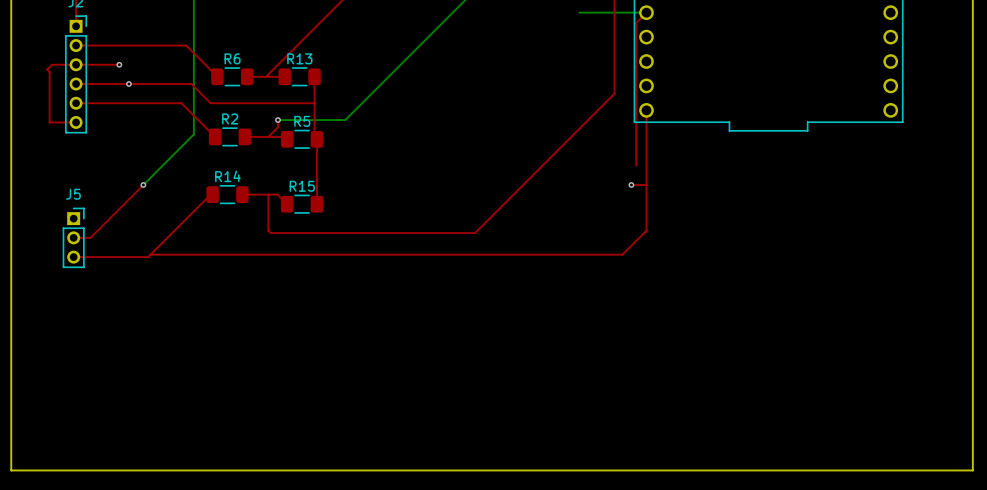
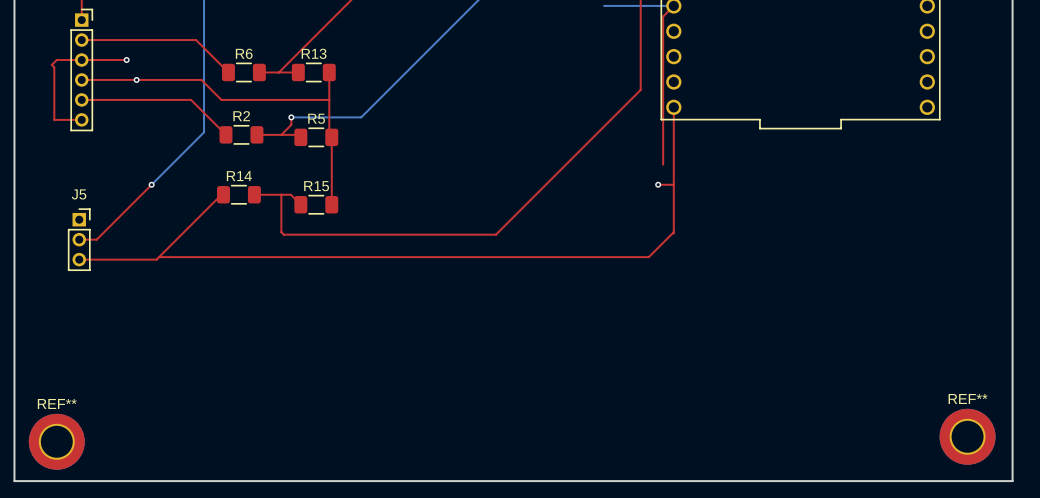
REF**: none -> (967, 436)
REF**: none -> (56, 441)

